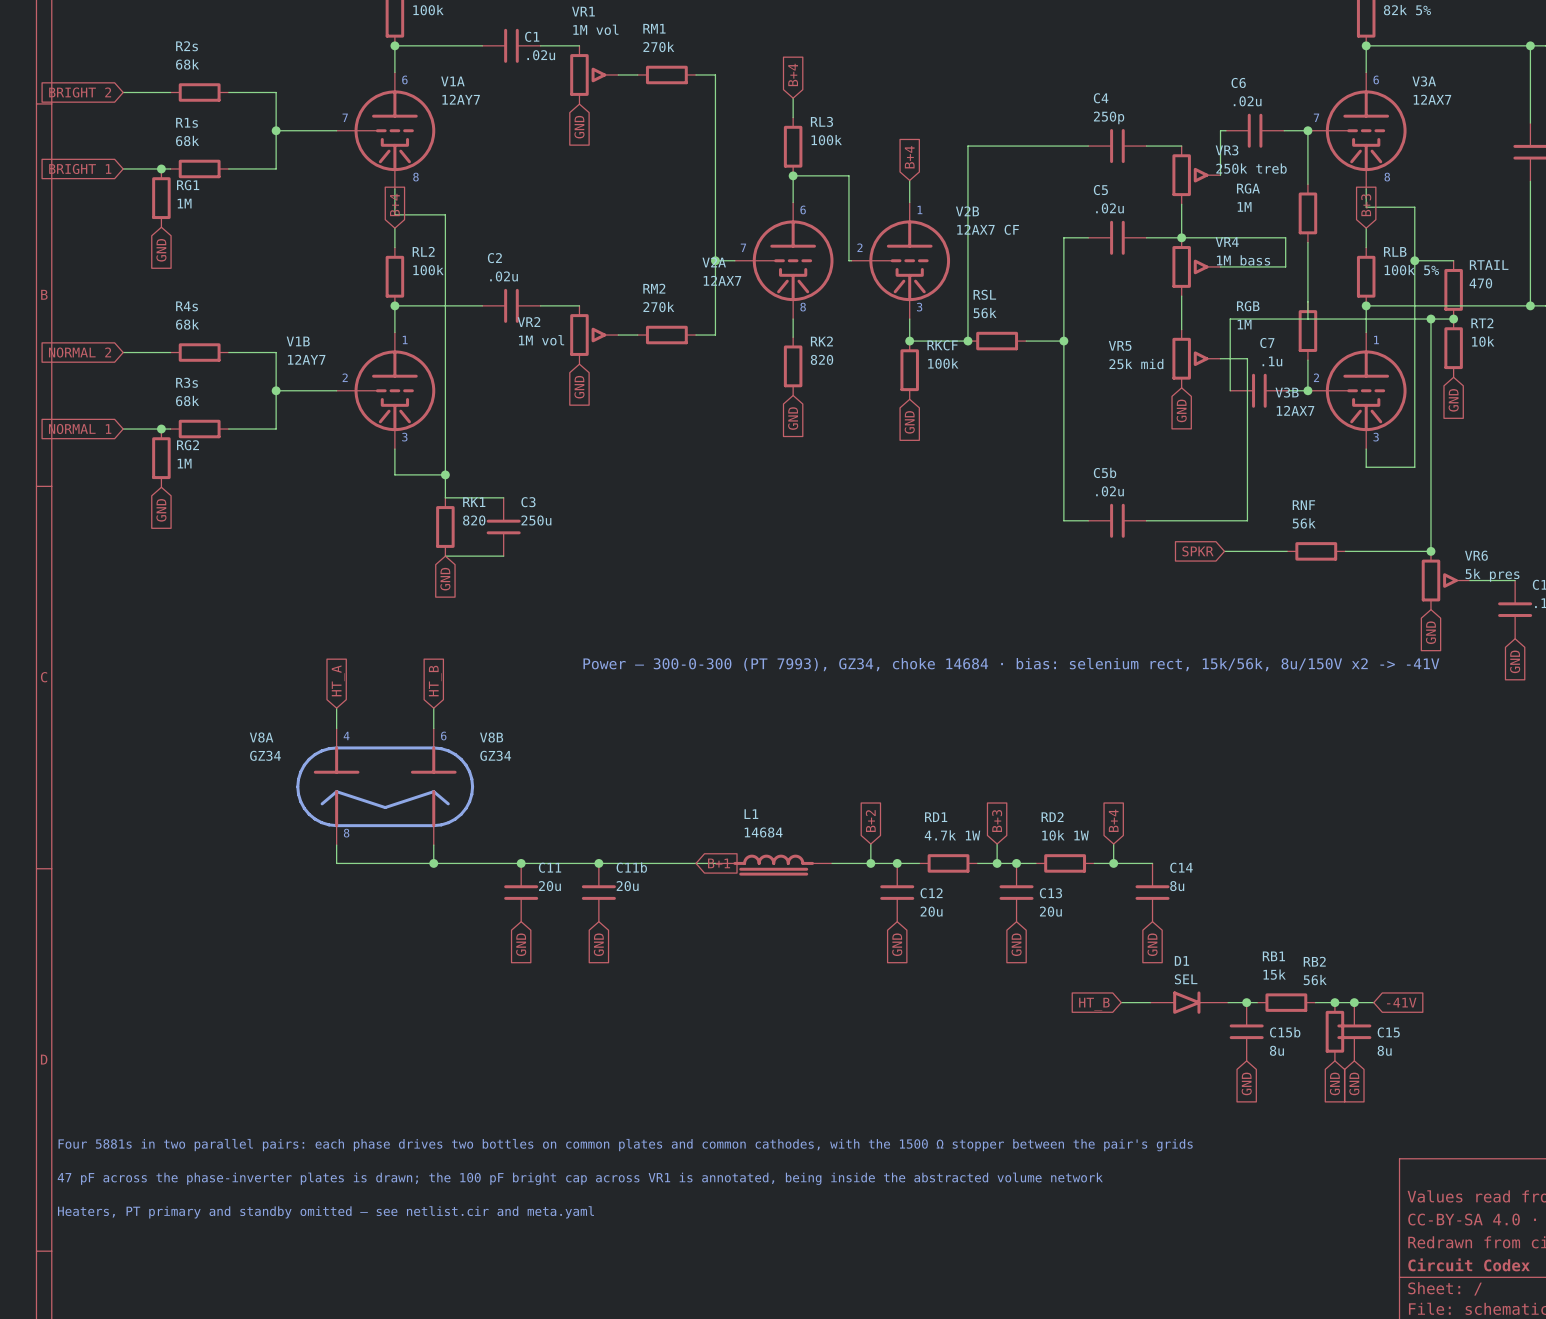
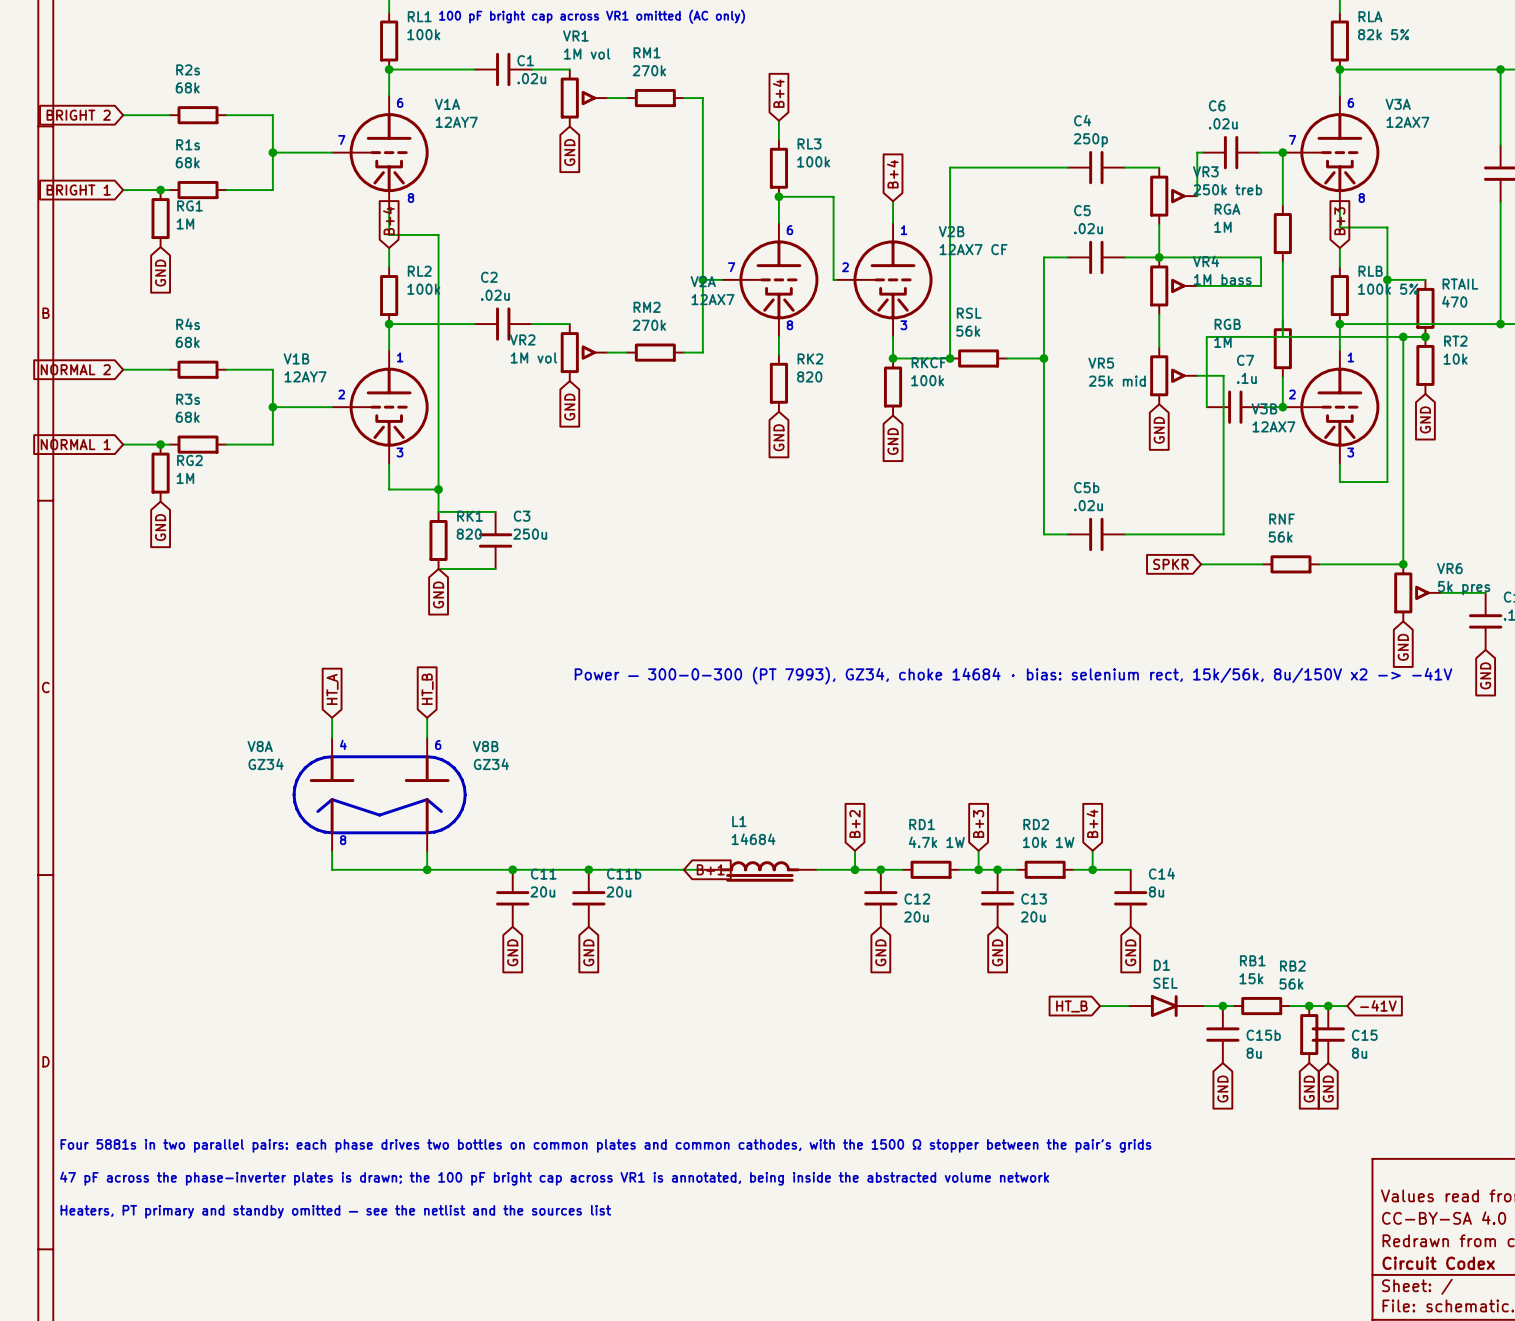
text: Heaters, PT primary and standby omitted — see netlist.cir and meta.yaml (325, 1212) -> Heaters, PT primary and standby omitted — see the netlist and the sources list (335, 1211)

